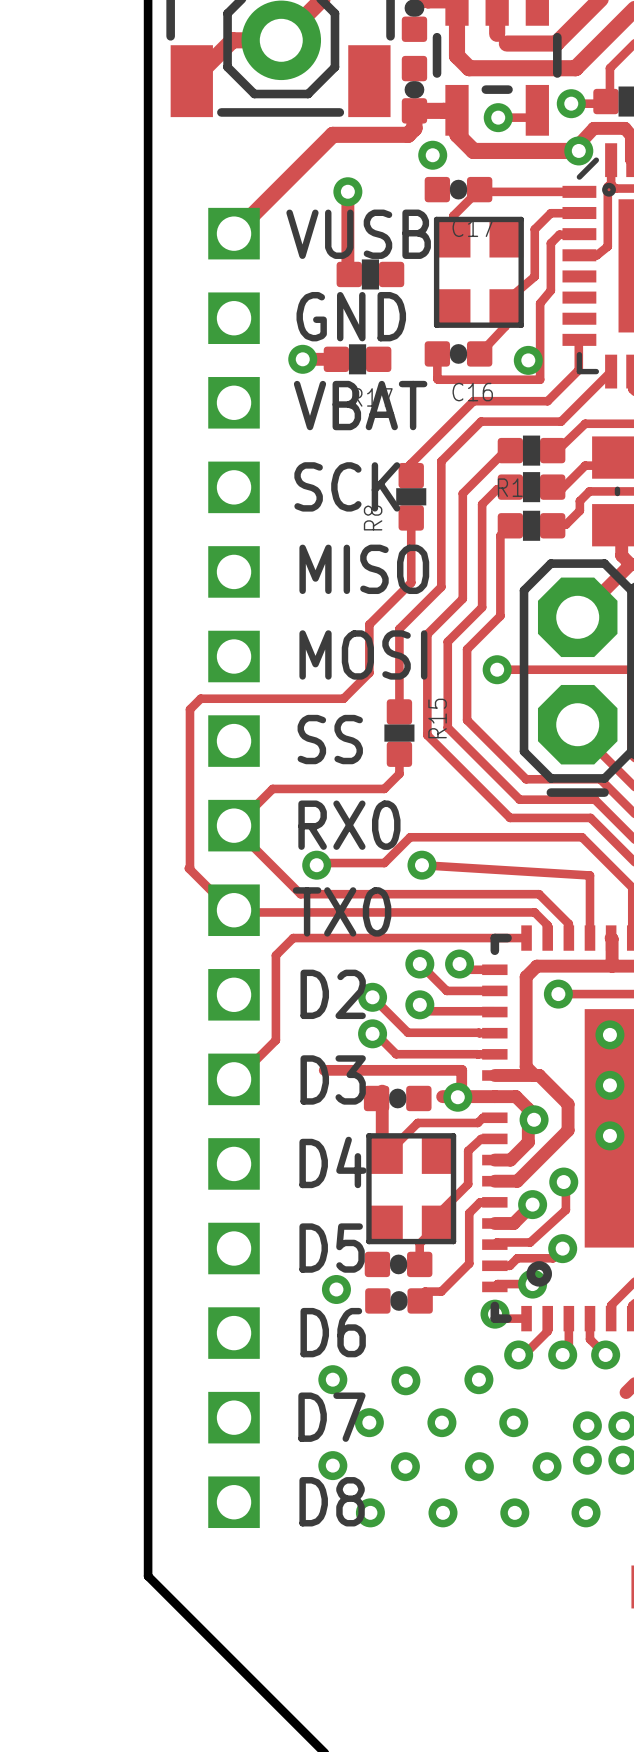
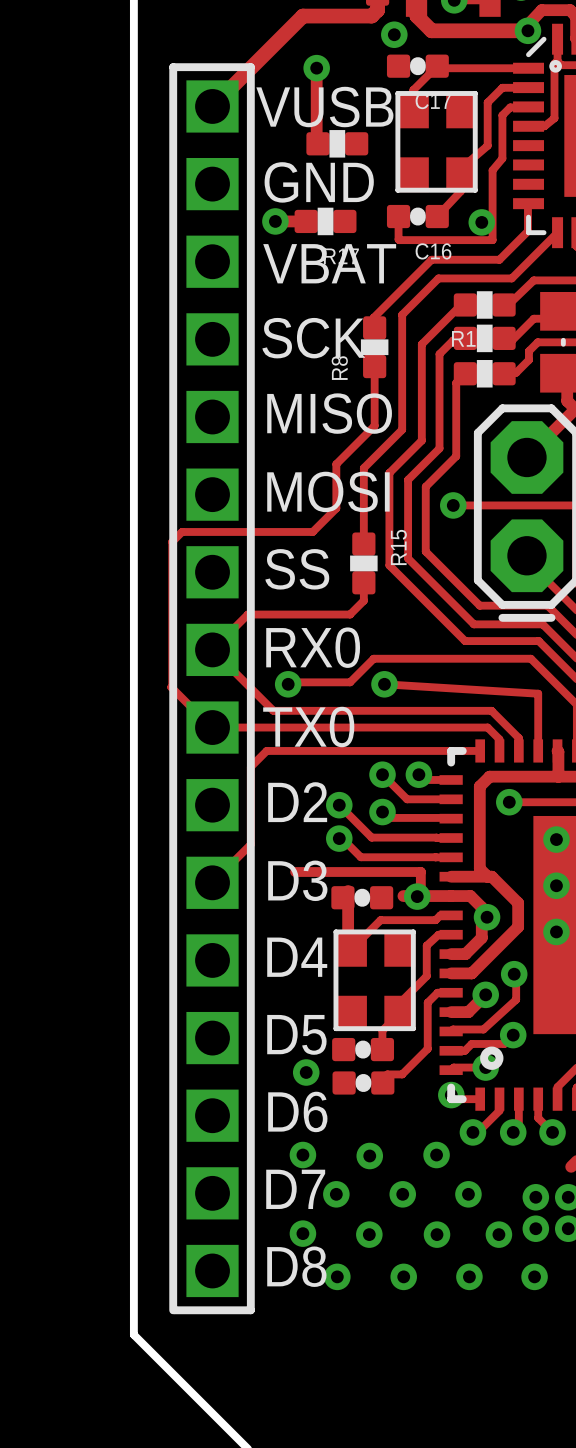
part footprint: [208, 207, 260, 1529] -> [169, 63, 255, 1315]

